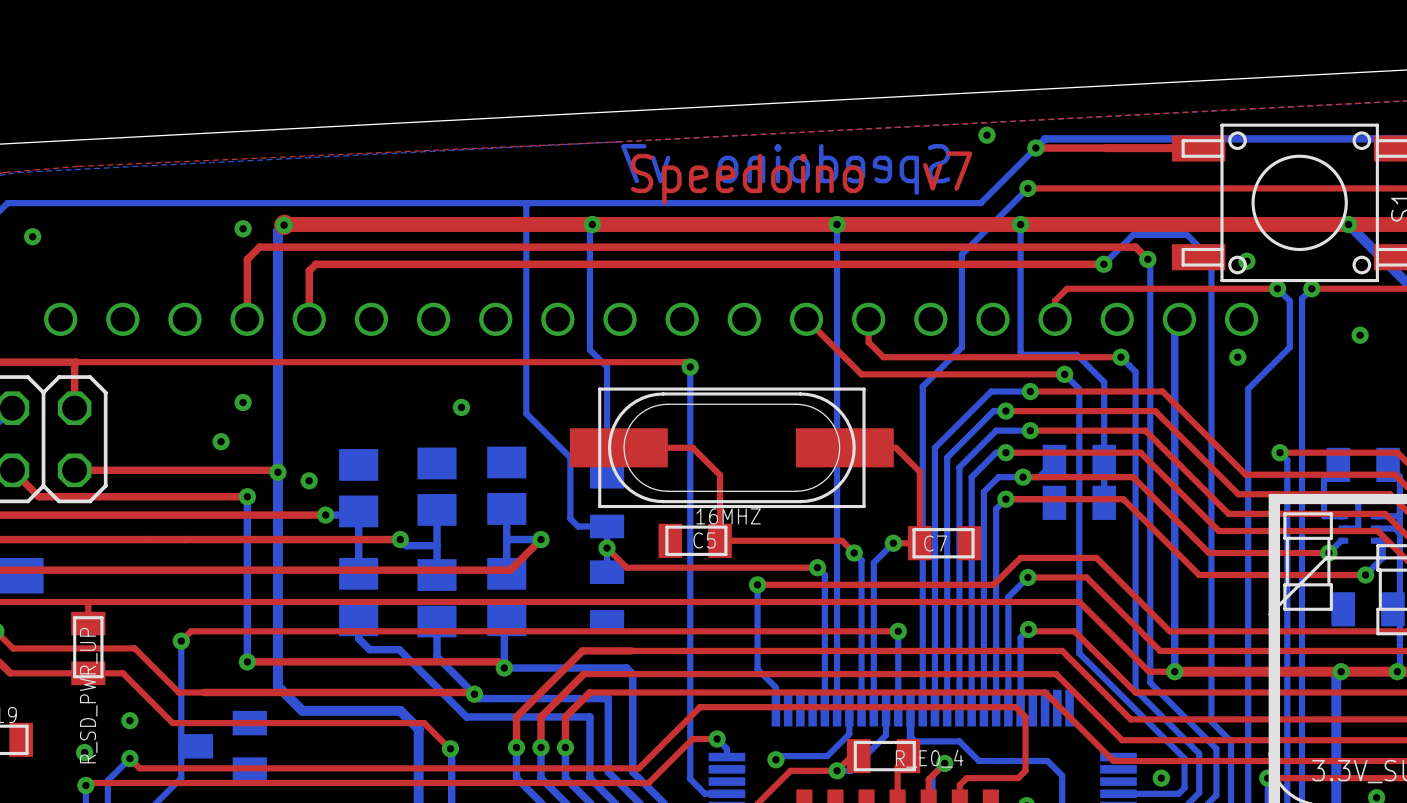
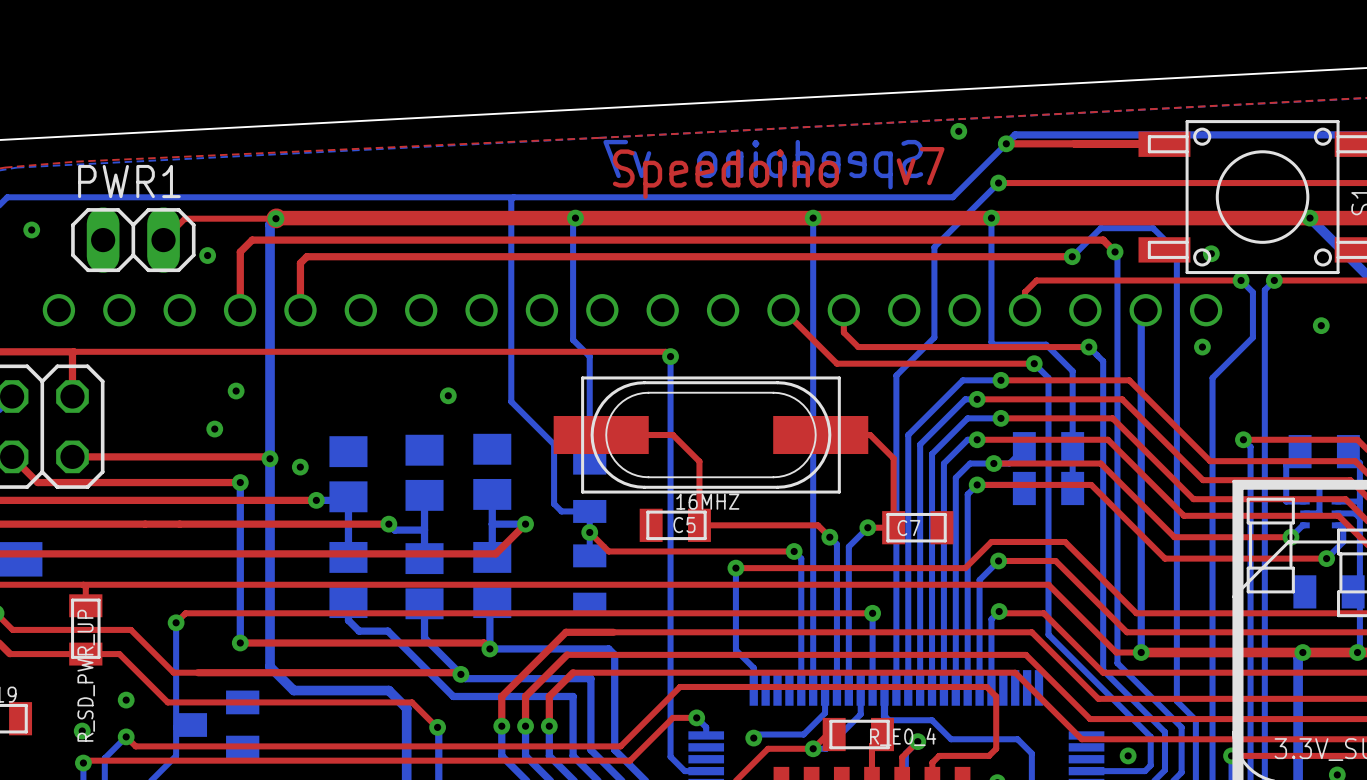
top track: none -> (275, 218) (184, 218) (163, 240)
via position: (243, 228) -> (207, 255)
PWR1: none -> (133, 240)

